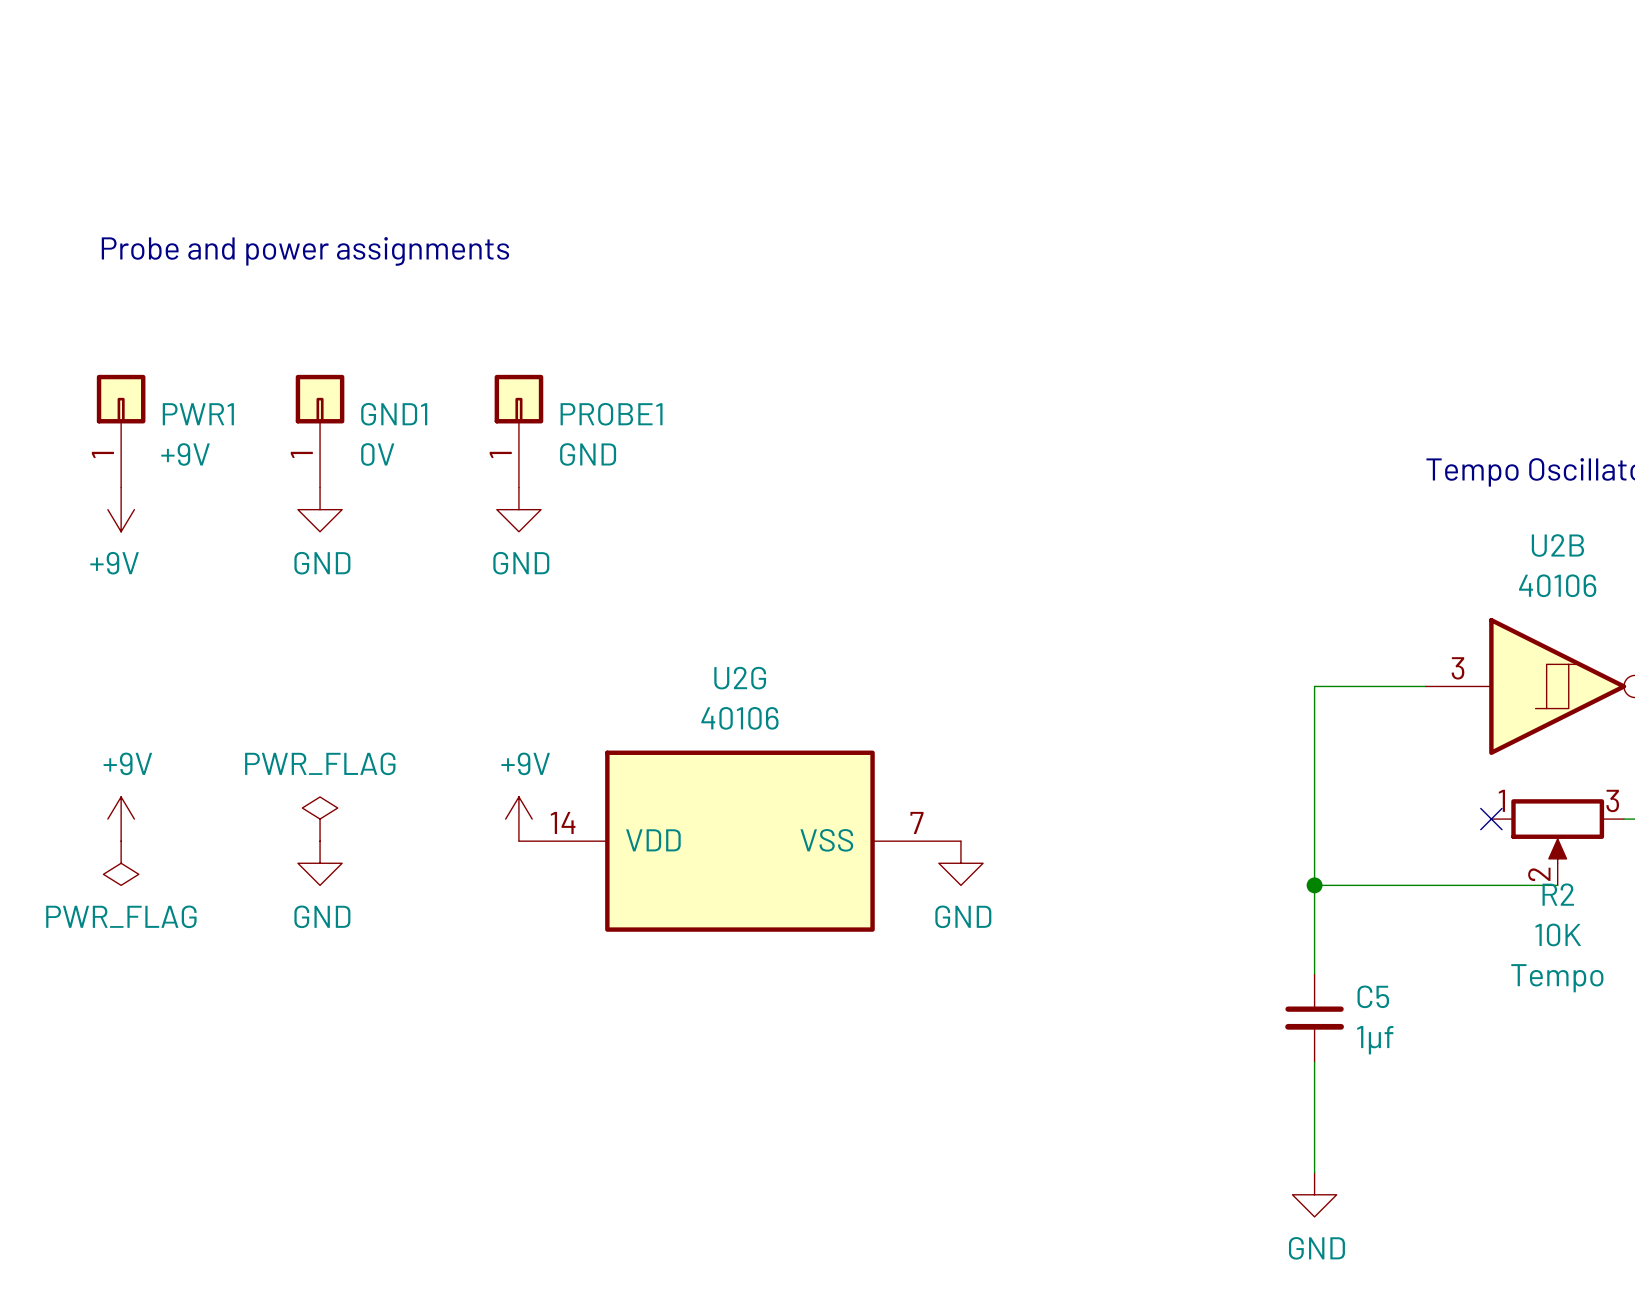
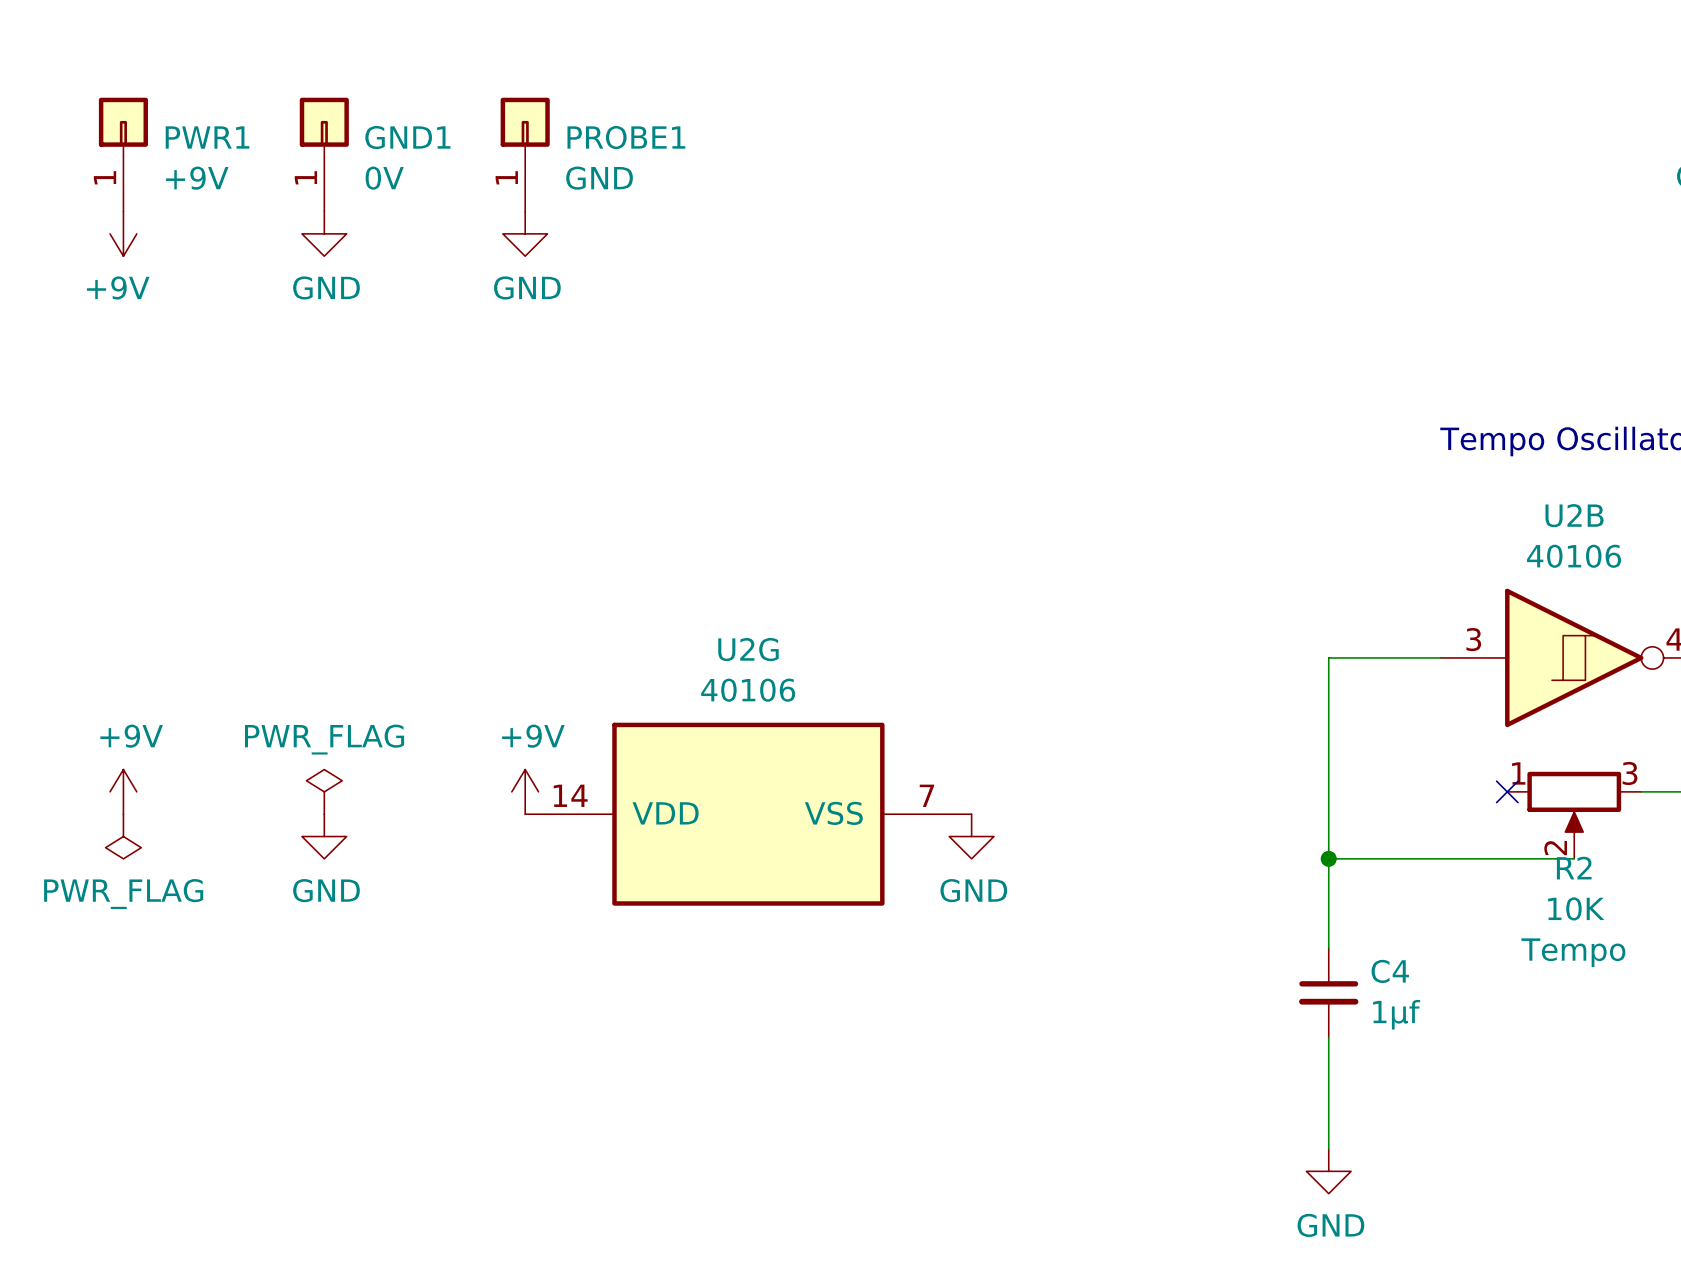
text: Probe and power assignments (305, 251) -> none
power symbol: none -> GND (324, 233)
power symbol: none -> GND (525, 233)
PWR1 position: (121, 431) -> (123, 154)
GND1 position: (320, 431) -> (324, 154)
PROBE1 position: (518, 431) -> (525, 154)
power symbol position: +9V (121, 509) -> +9V (123, 233)
power symbol: GND (320, 509) -> none
power symbol: GND (518, 509) -> none
C5 name: C5 (1373, 996) -> C4 (1390, 971)

